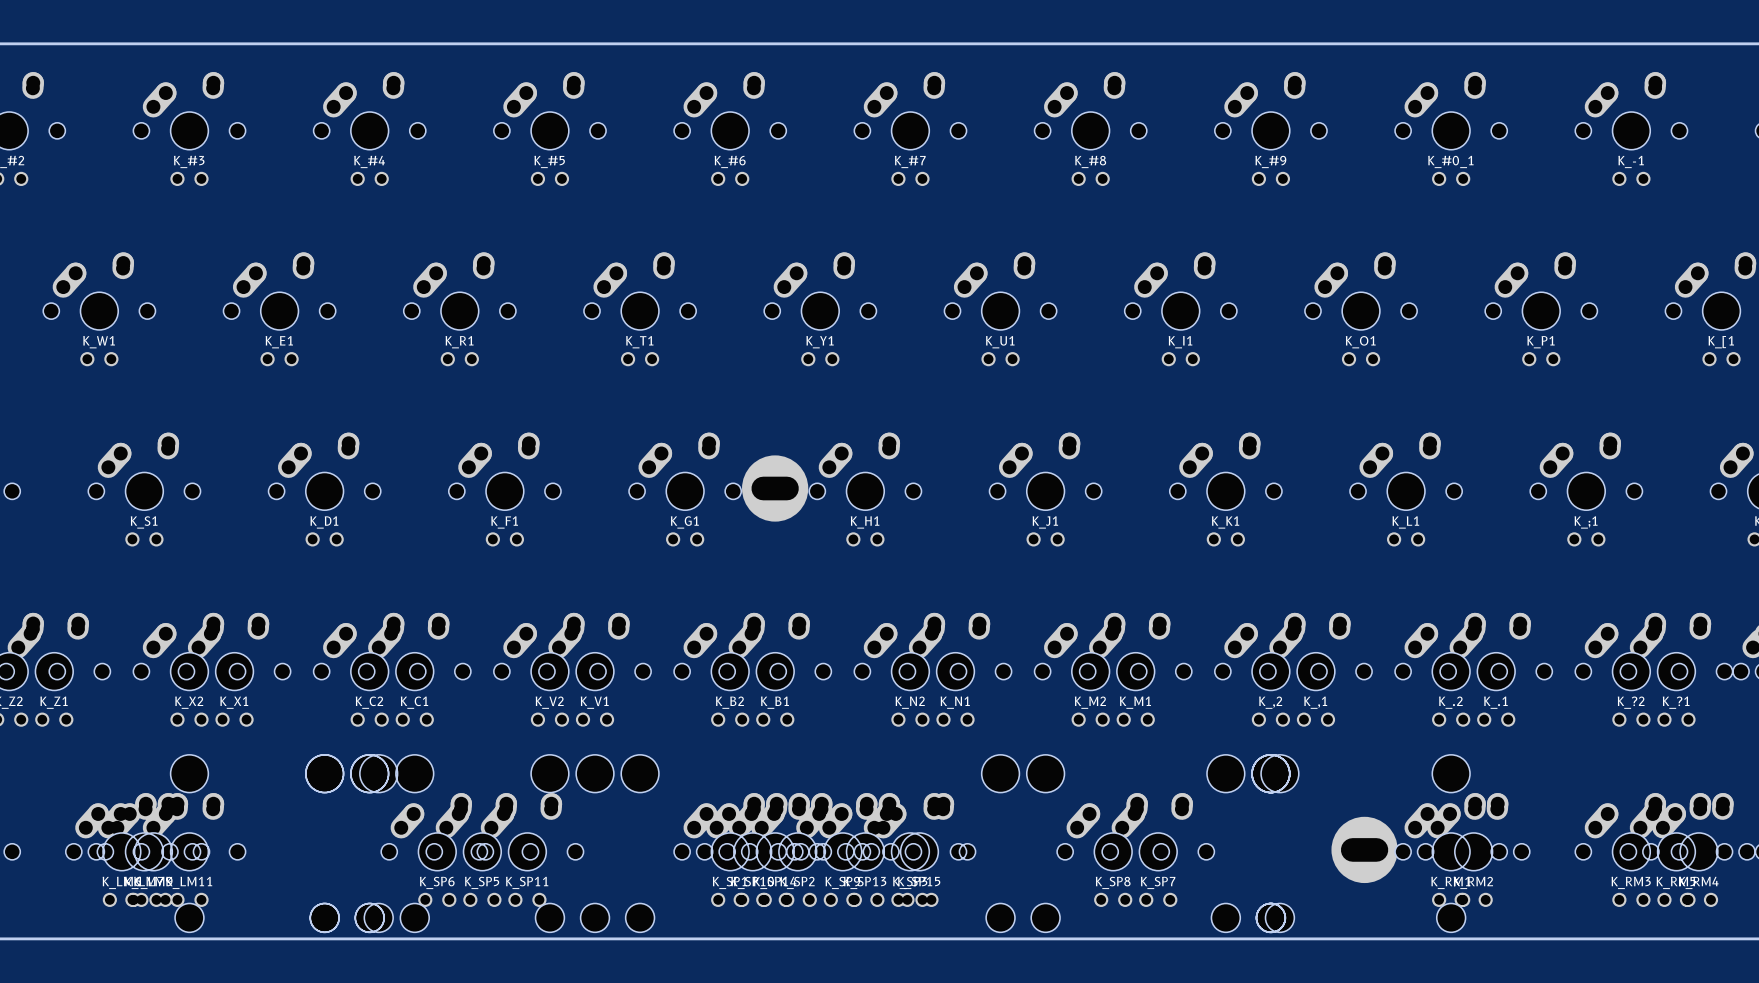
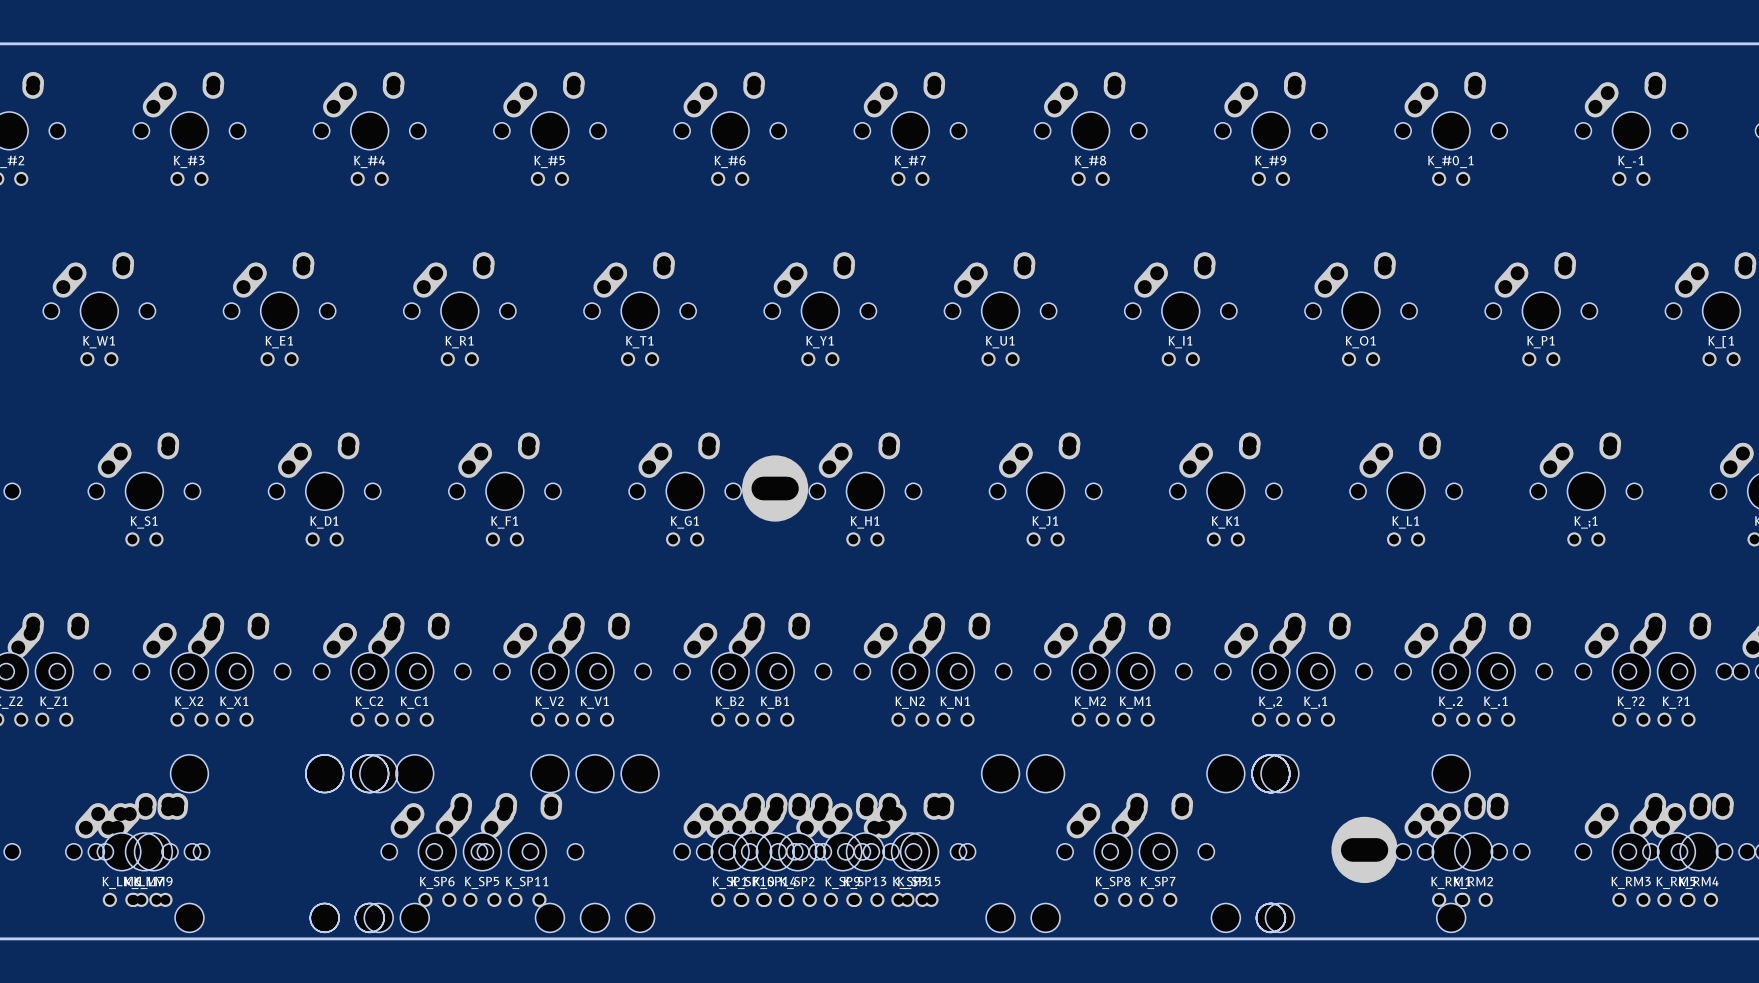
K_LM11: (189, 850) -> none

